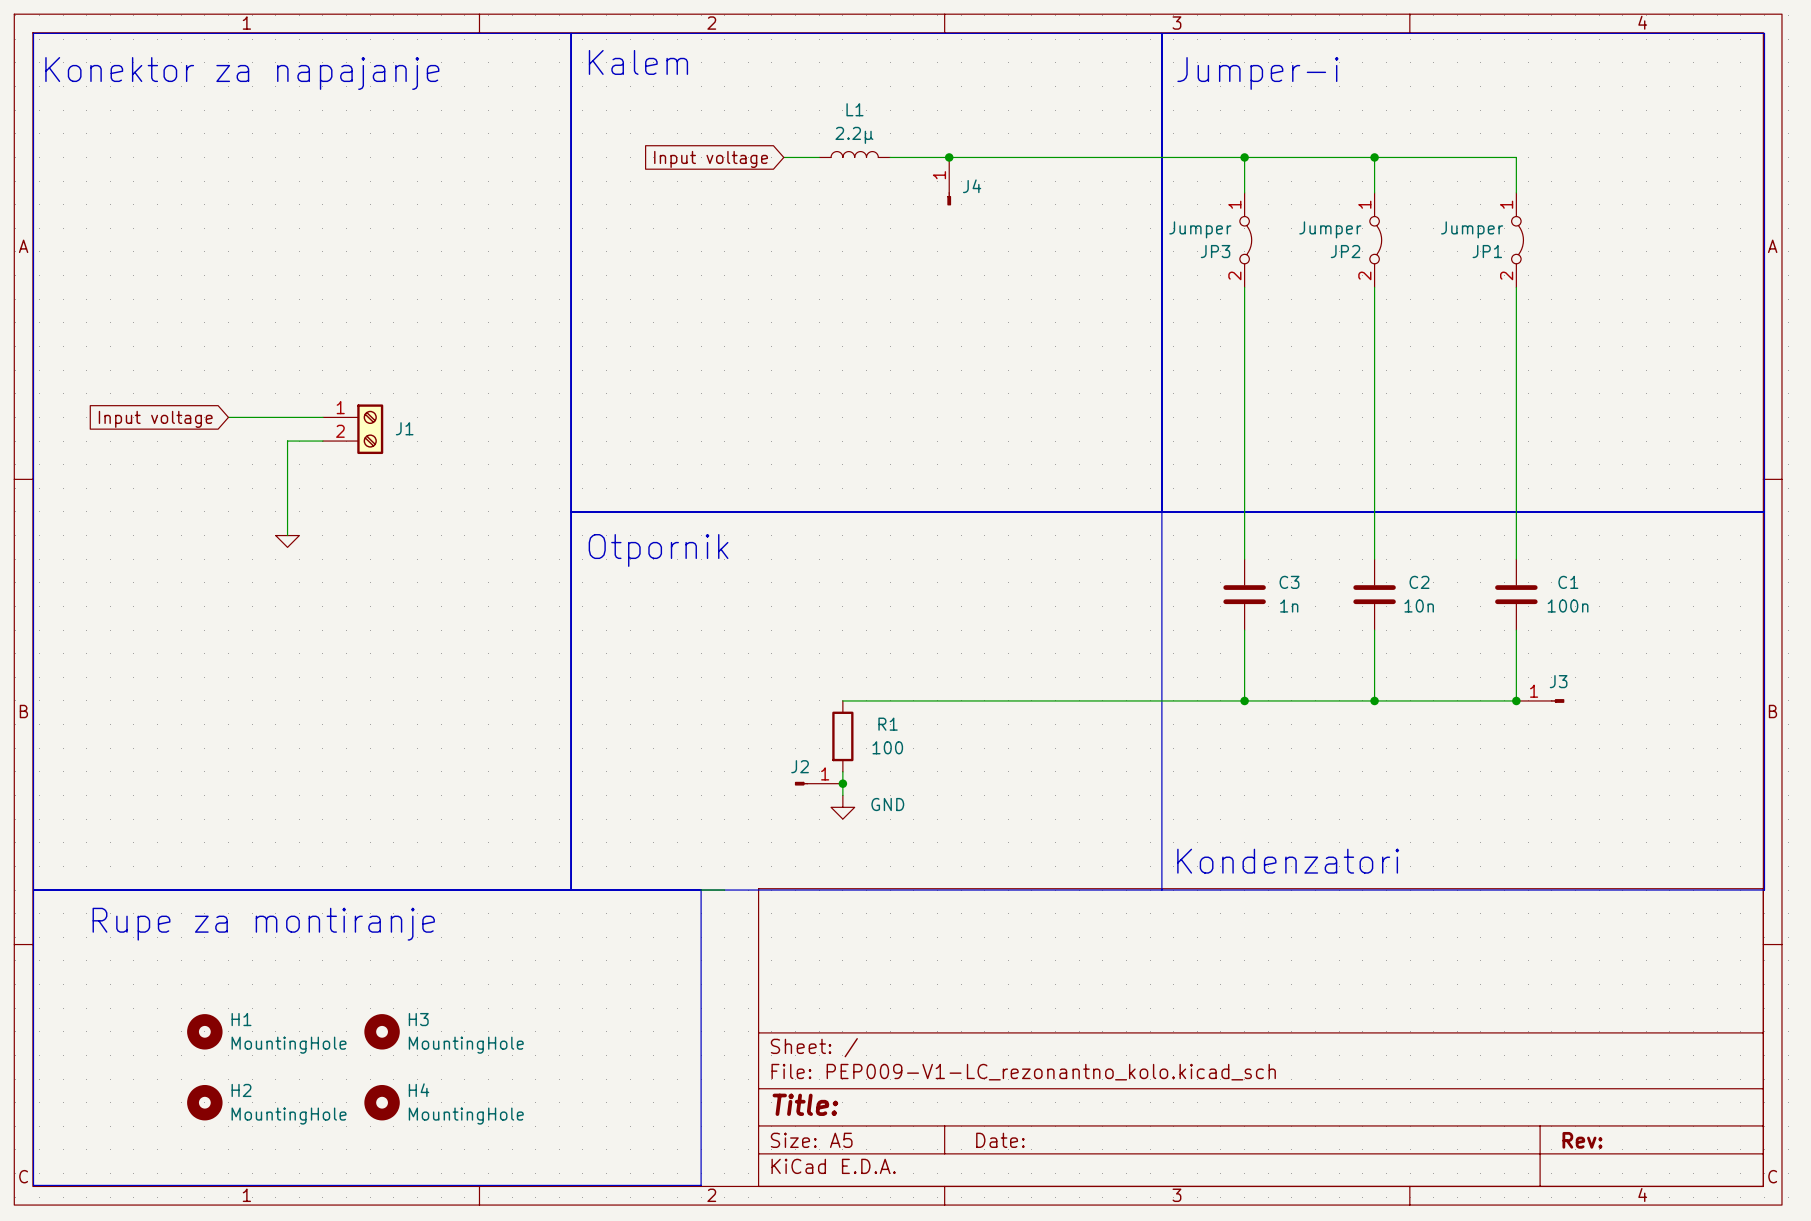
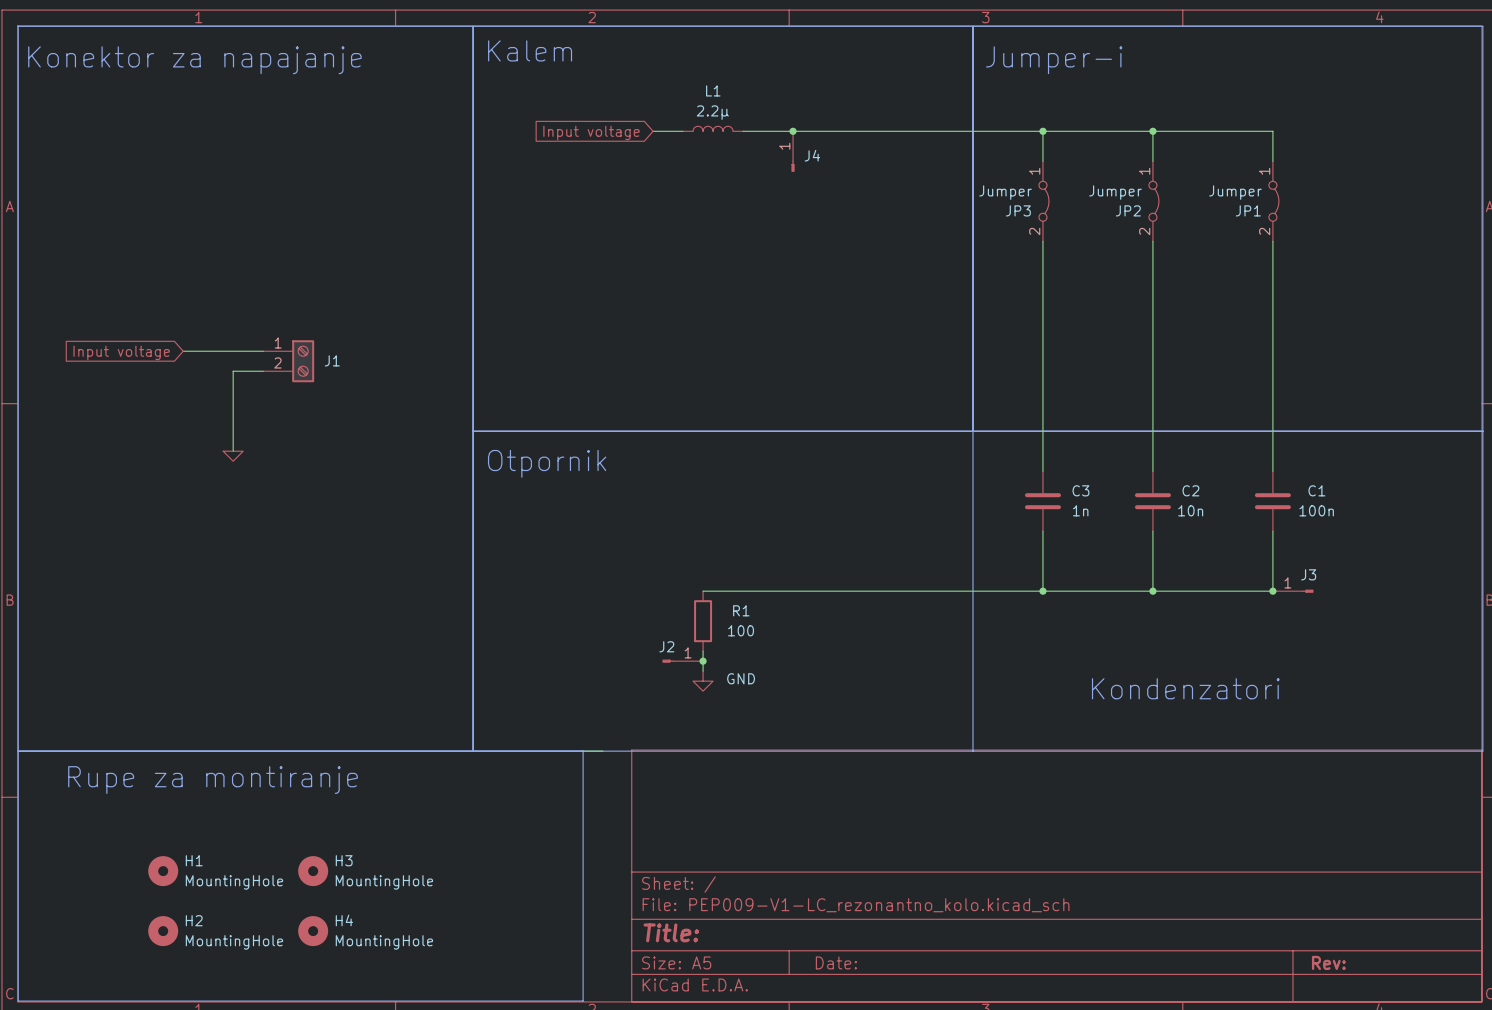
text position: Kondenzatori (1288, 861) -> Kondenzatori (1185, 688)

